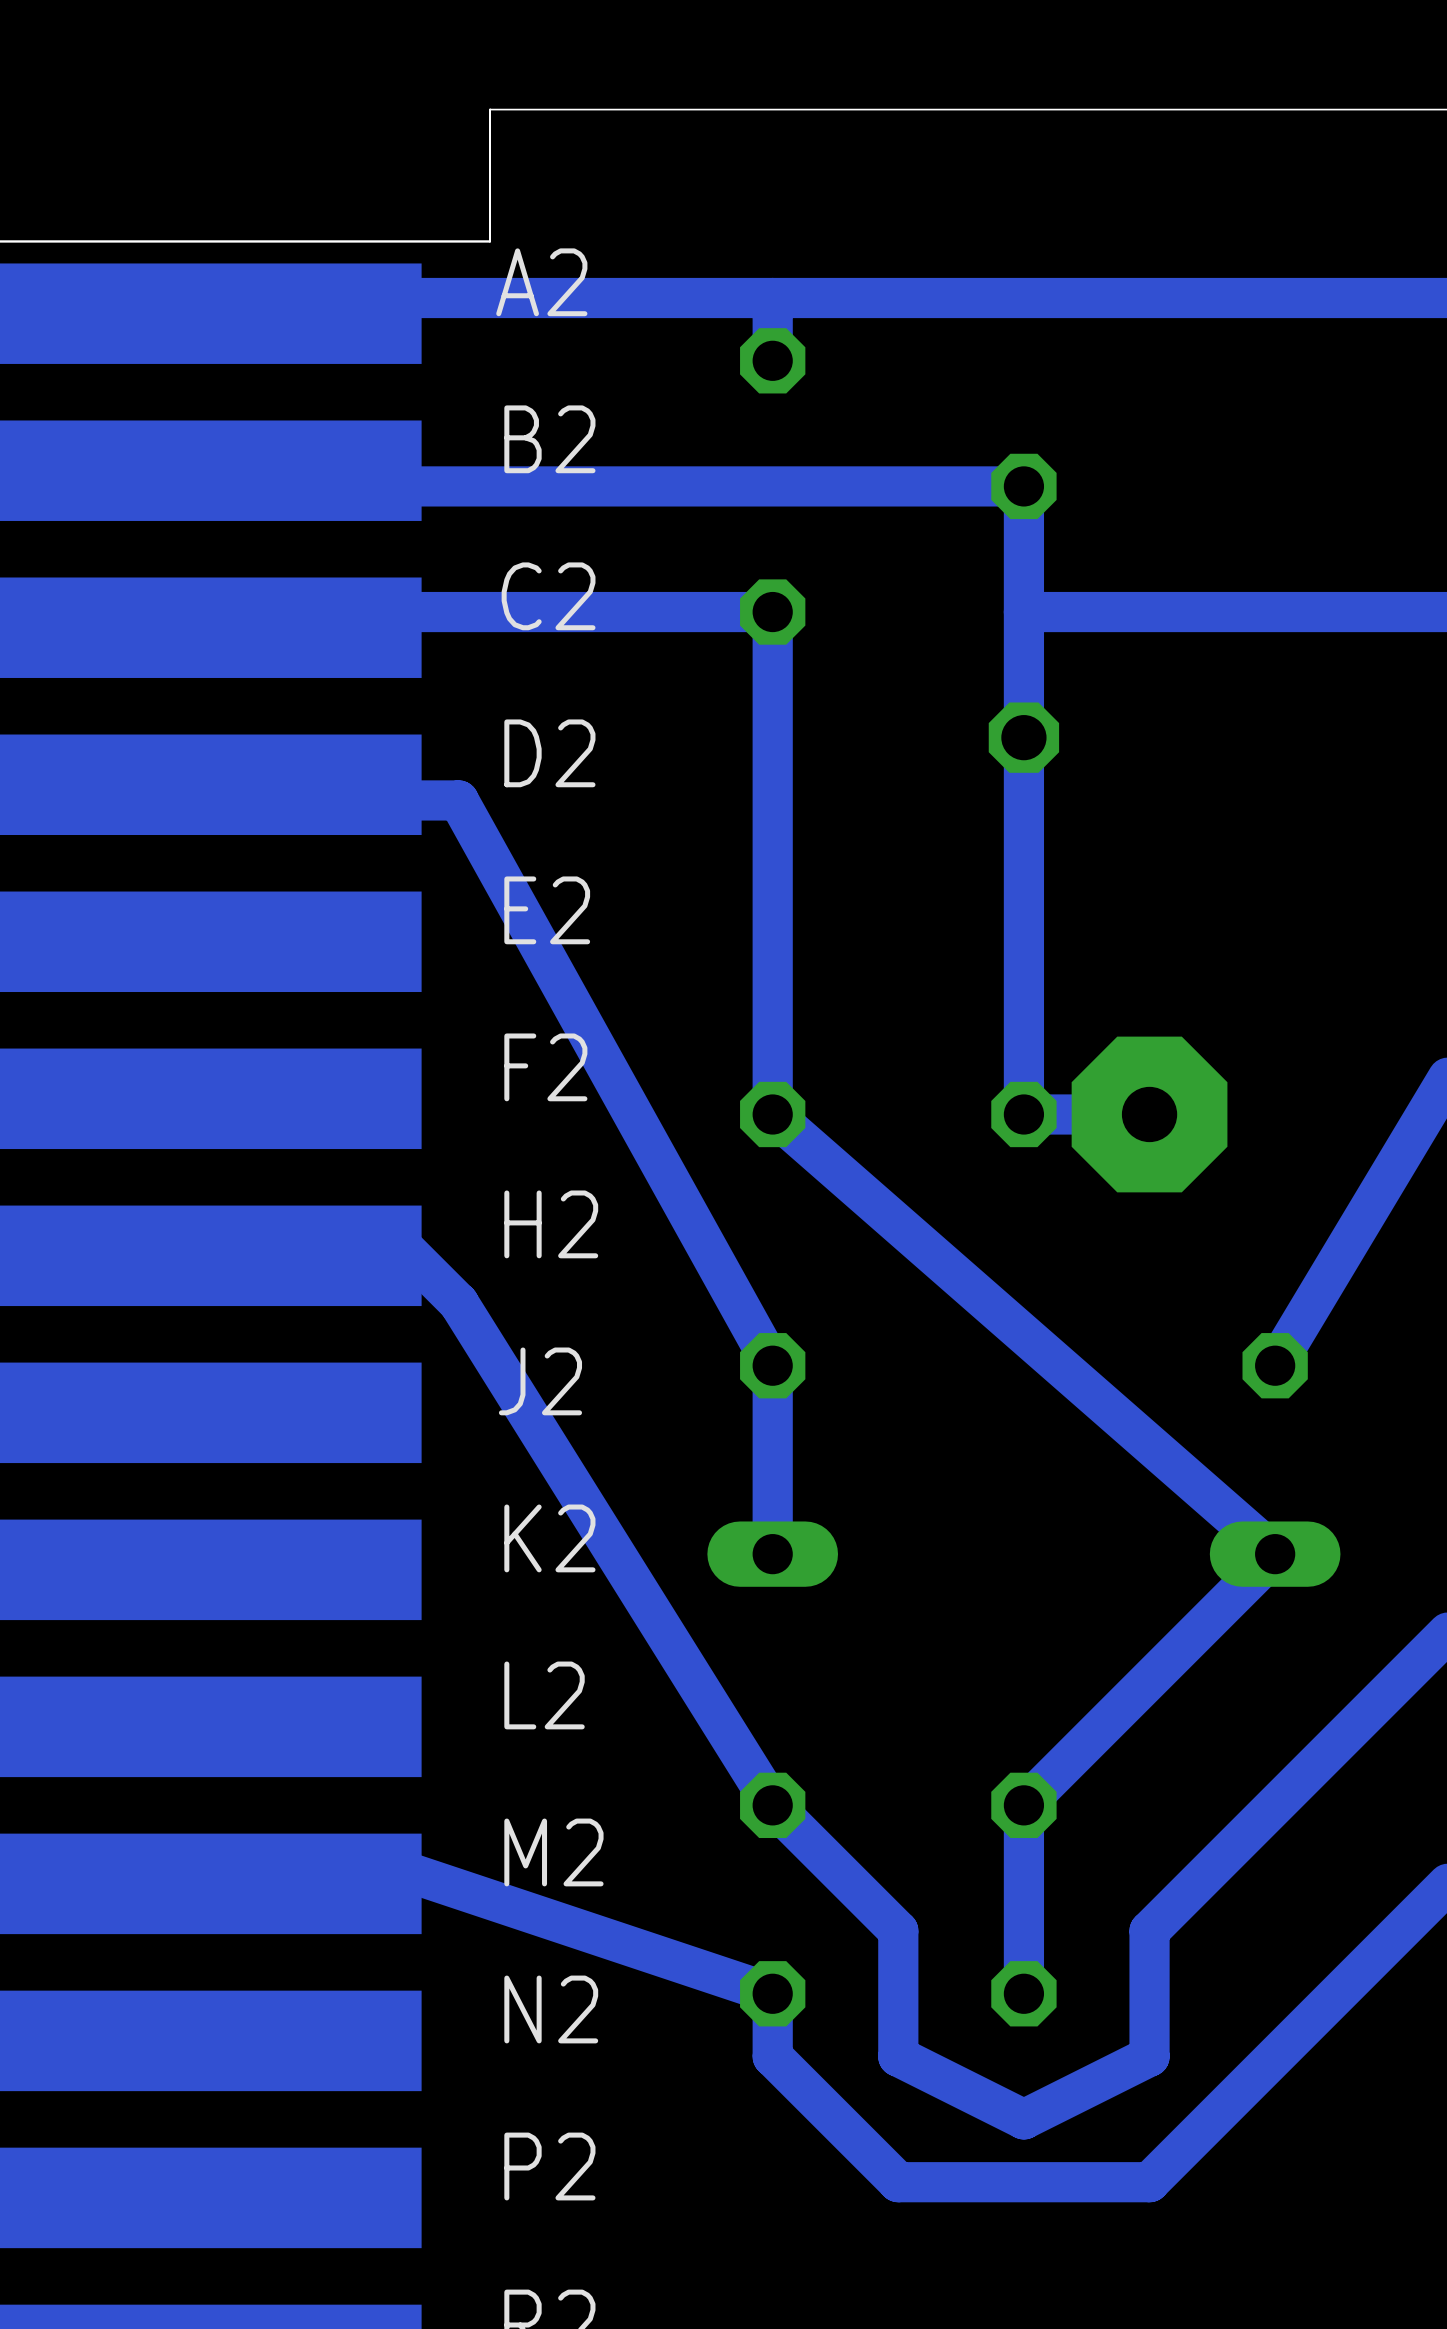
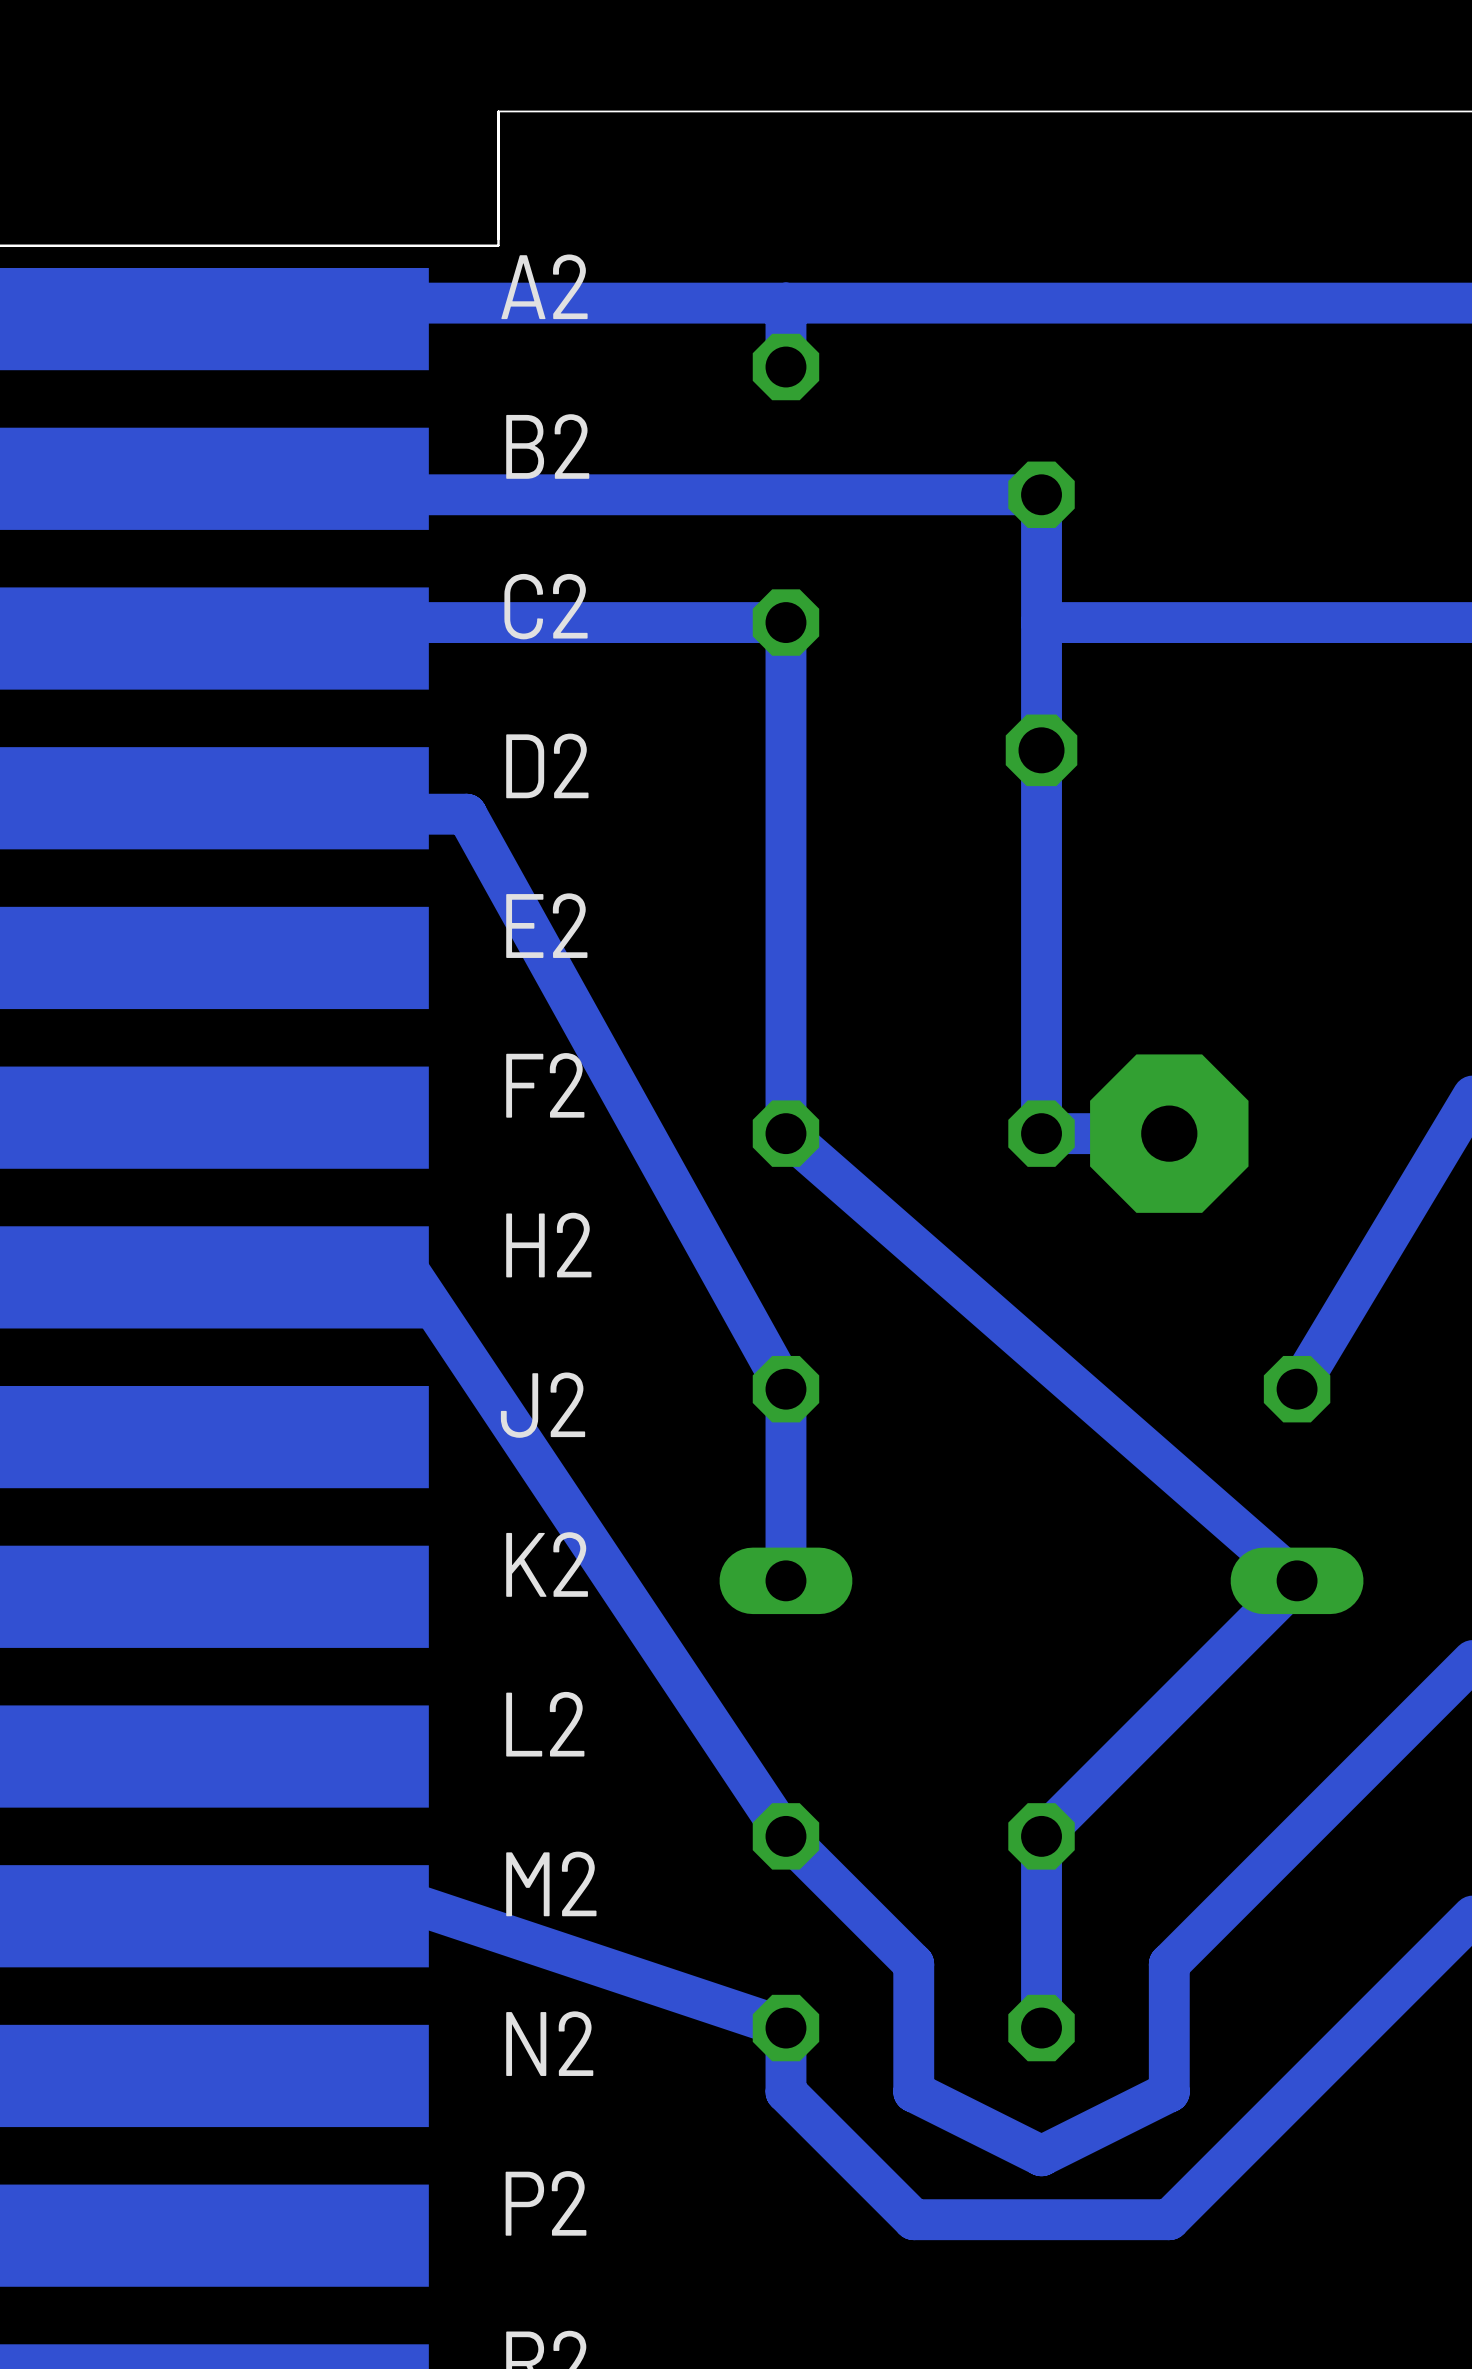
bottom track: (395, 1240) (458, 1302) (772, 1805) -> (402, 1261) (785, 1836)

